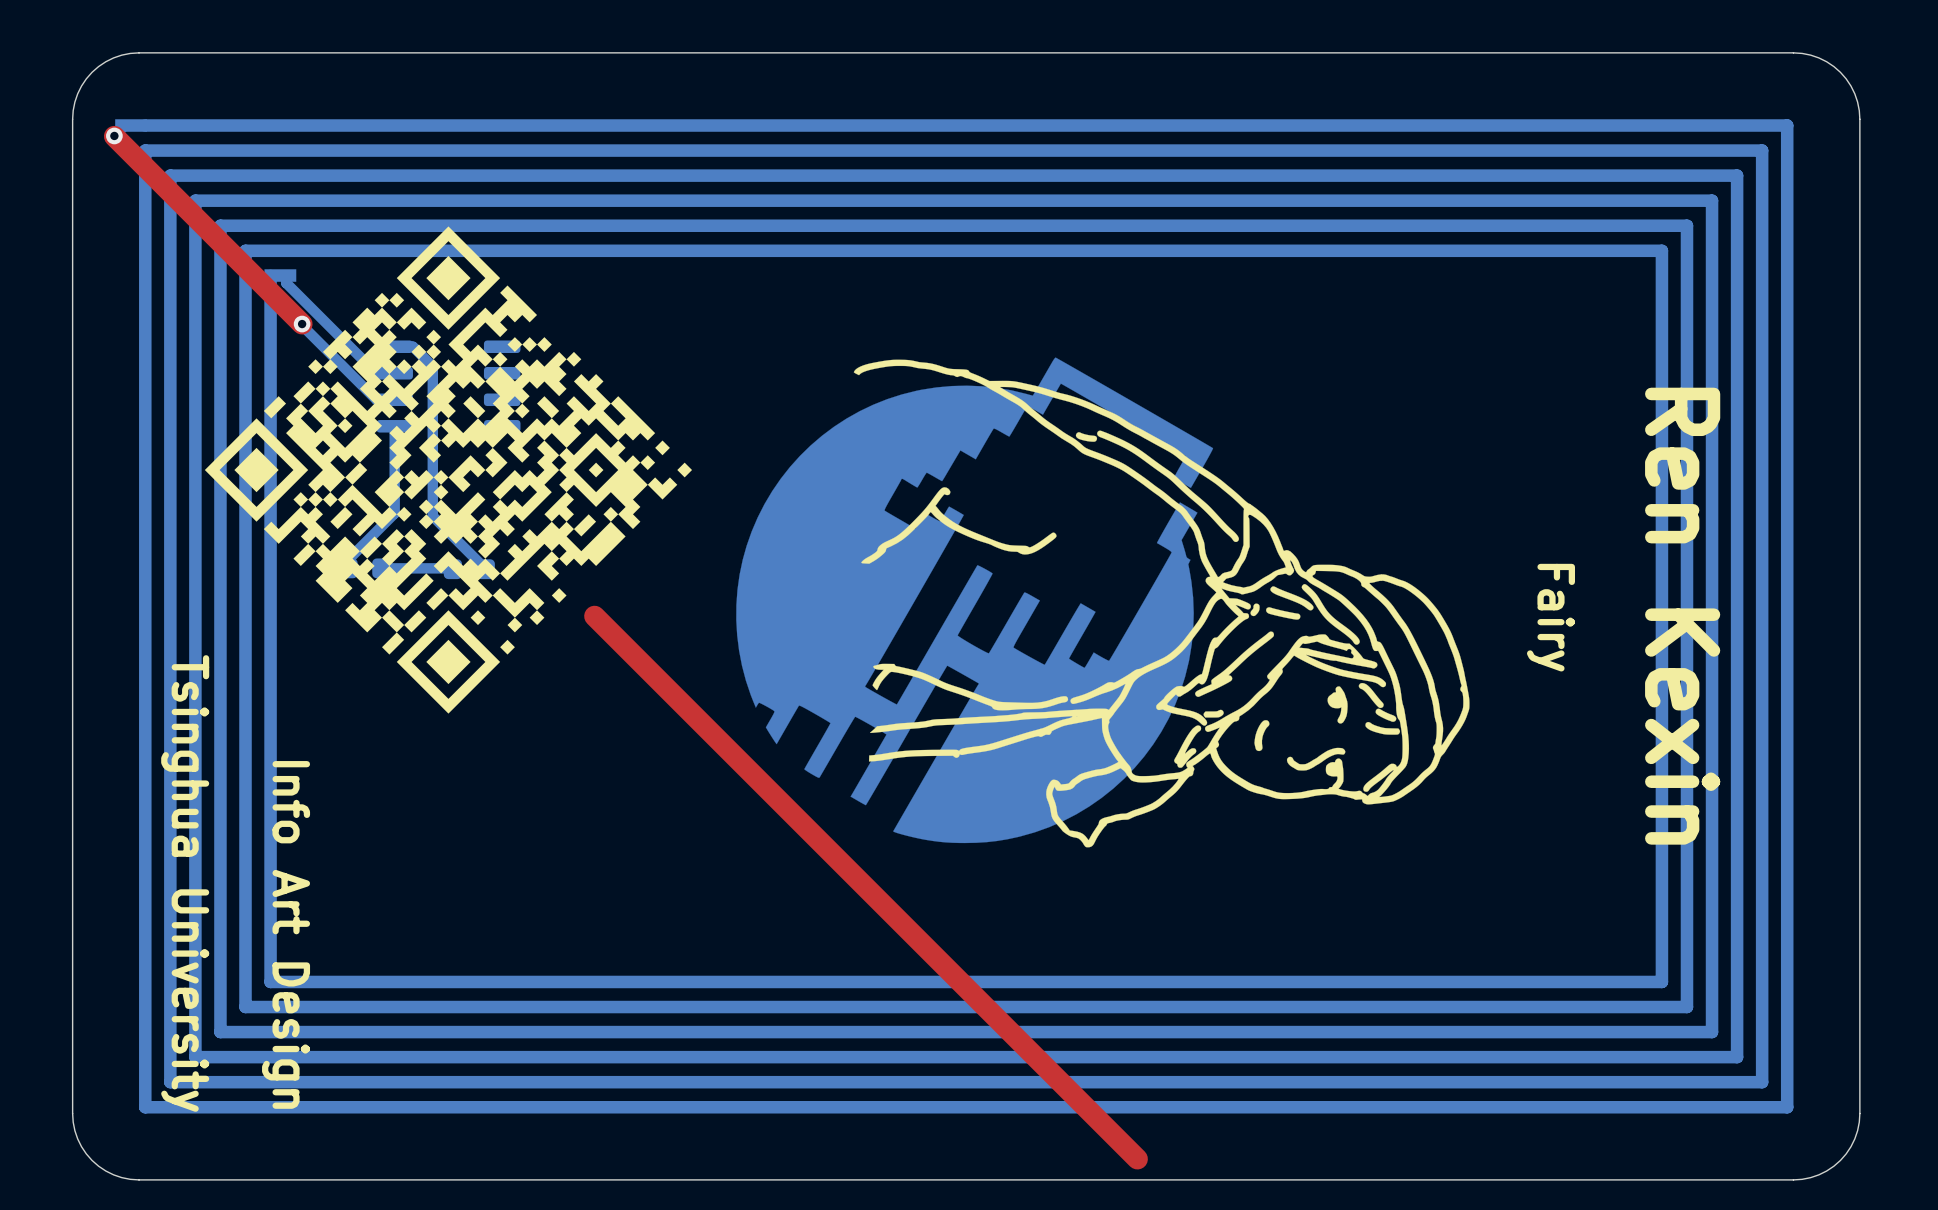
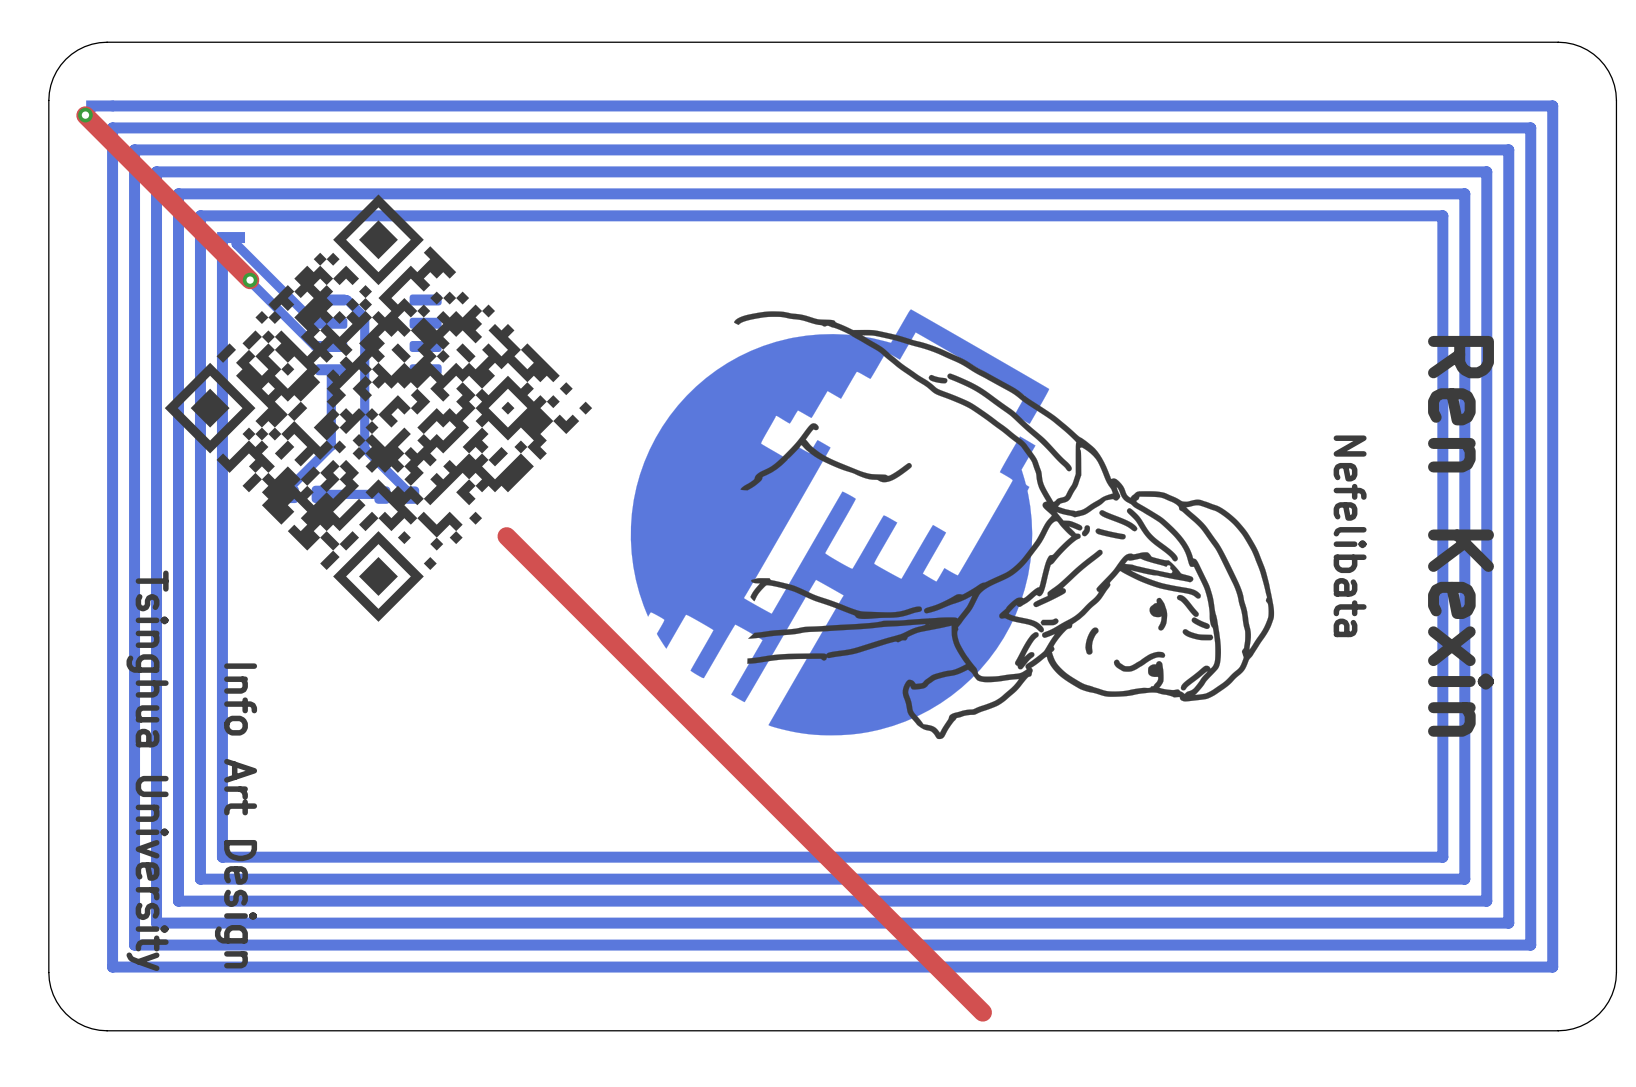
text: Fairy (1550, 617) -> Nefelibata (1350, 536)

